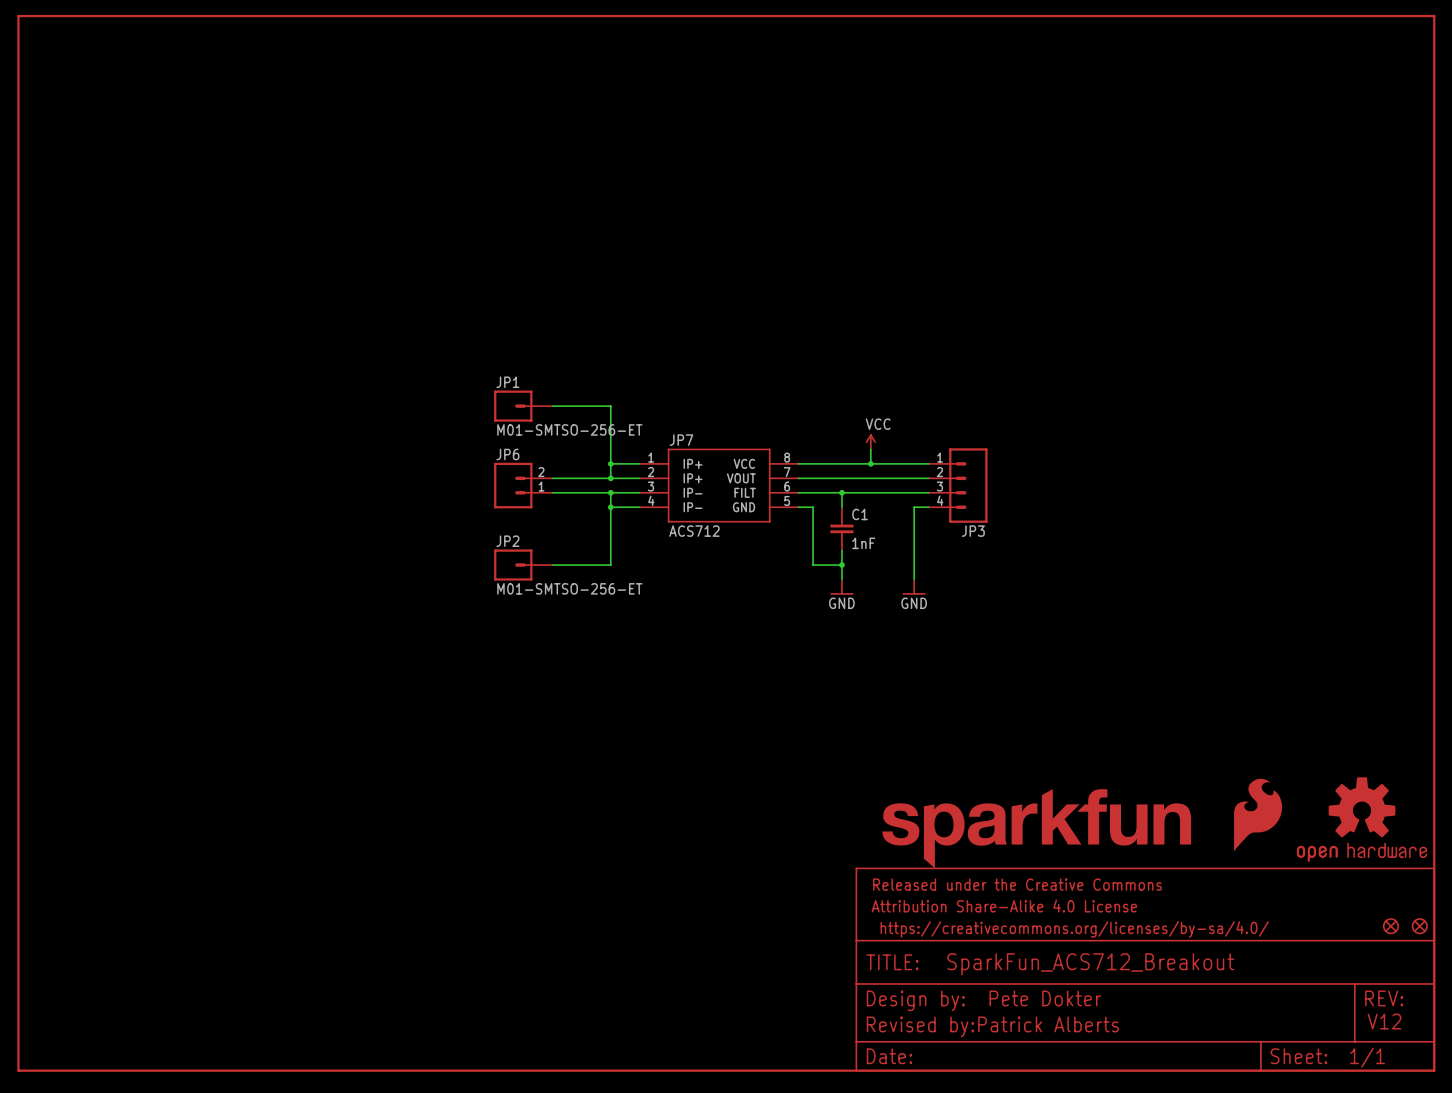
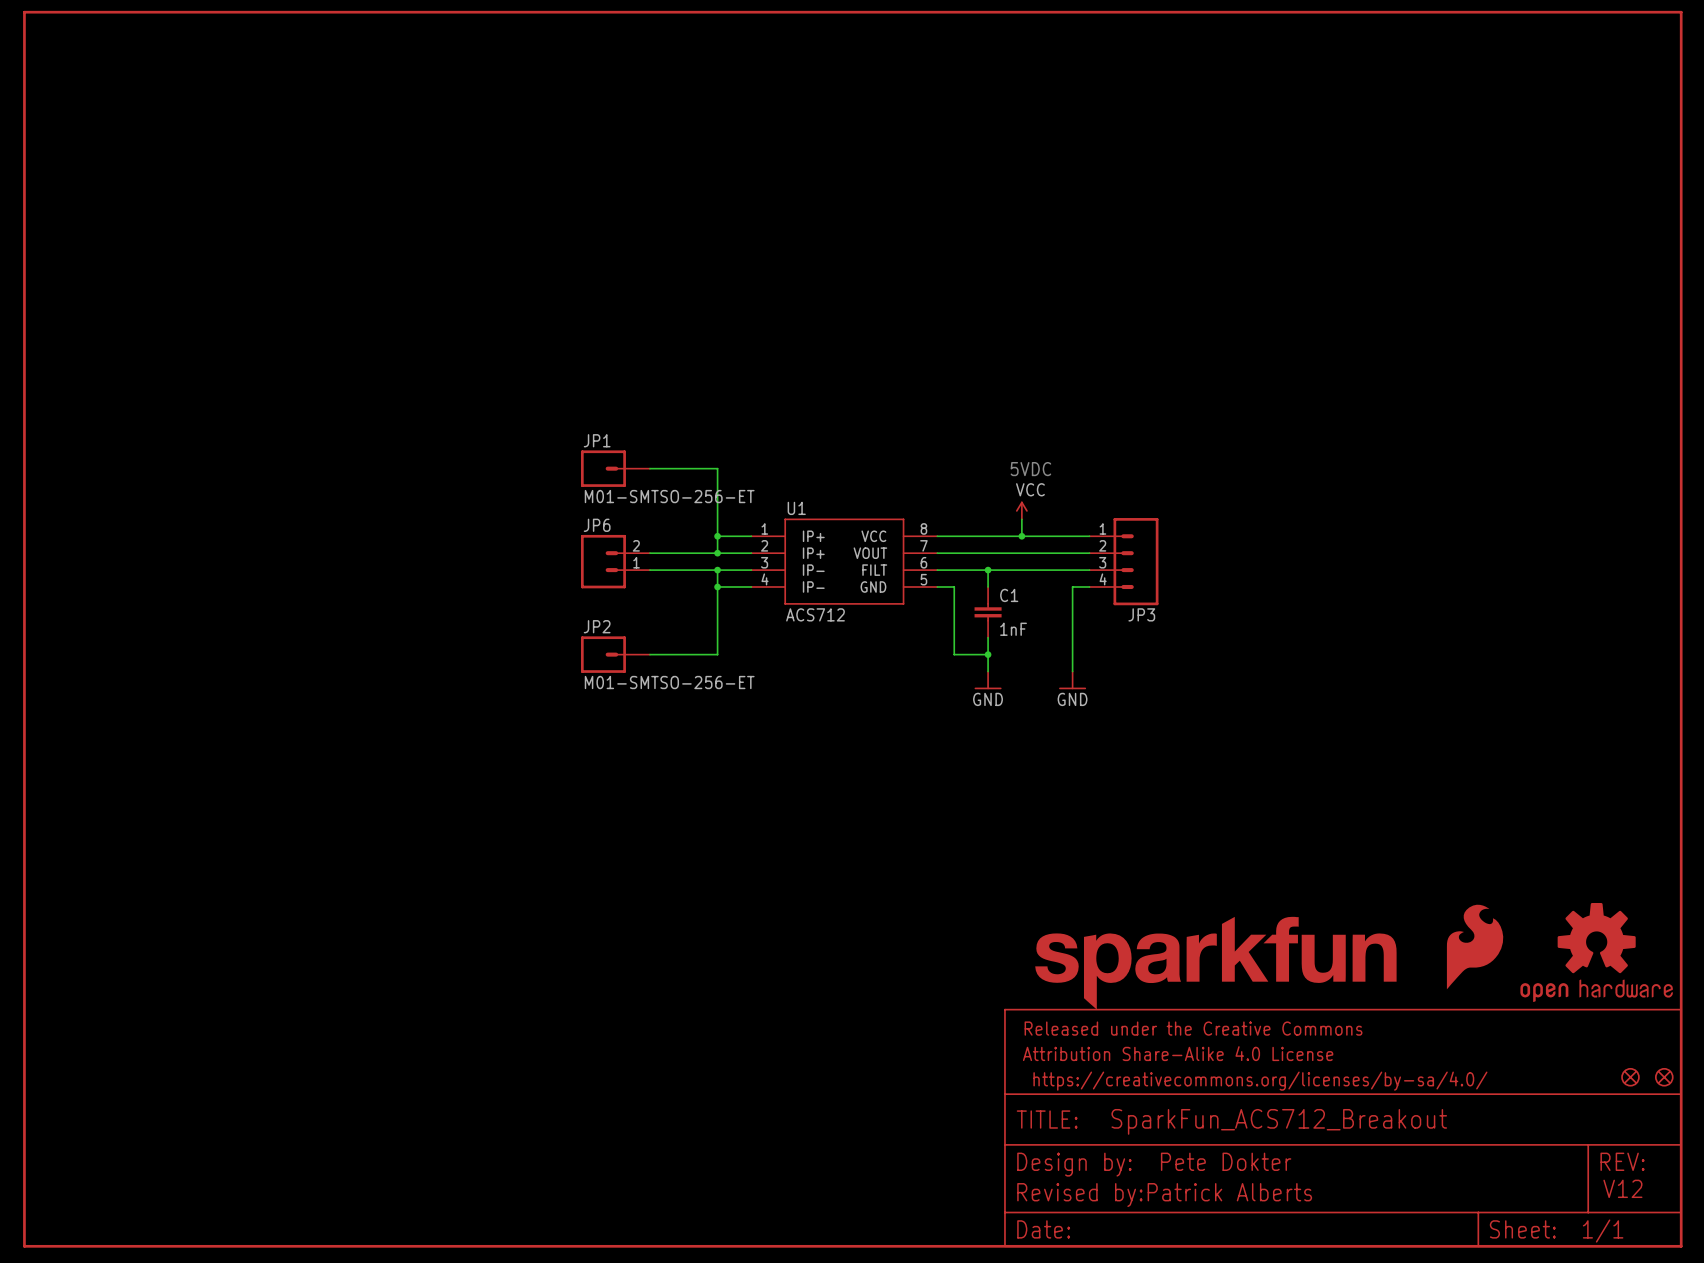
text: none -> 5VDC (1030, 469)
JP7 name: JP7 (681, 440) -> U1 (796, 508)

